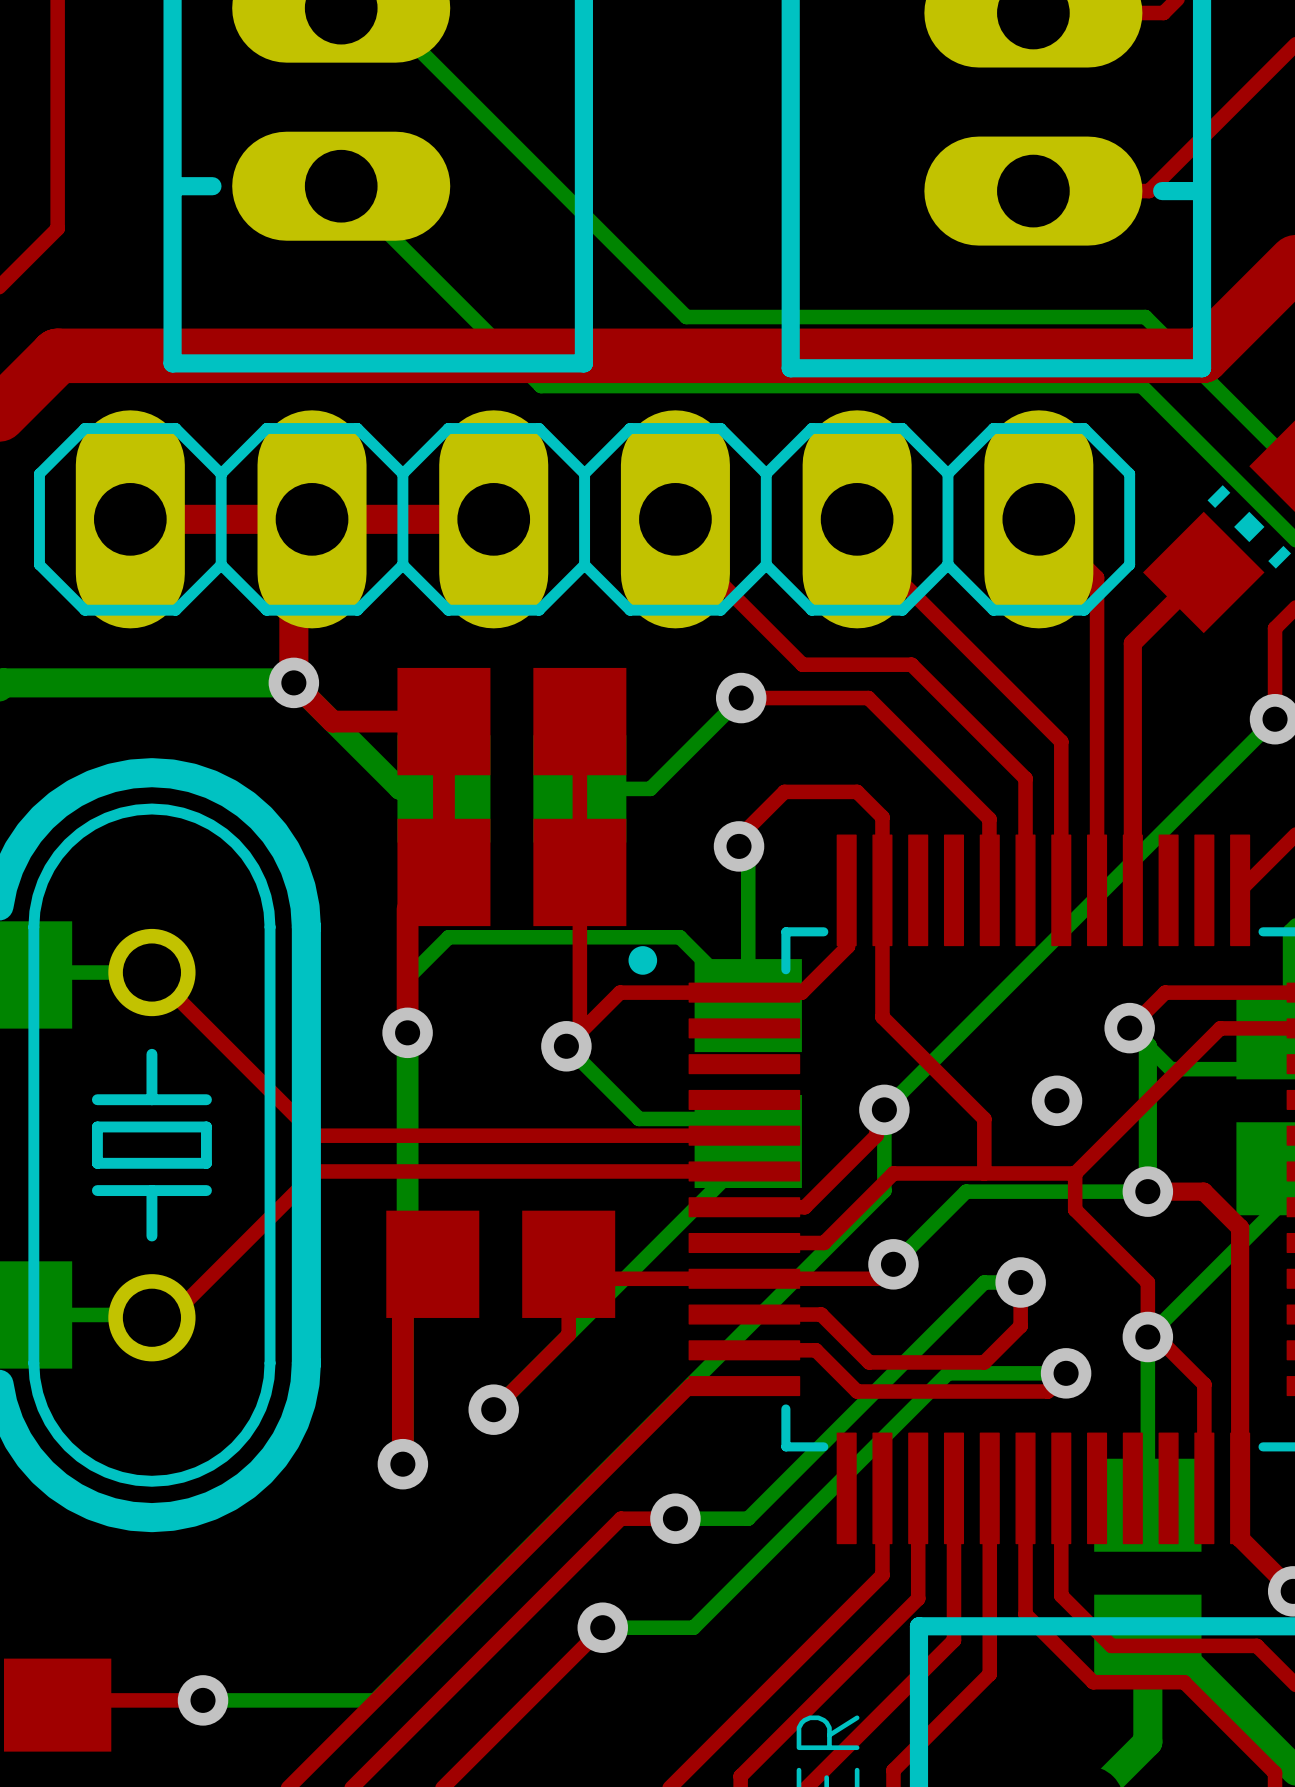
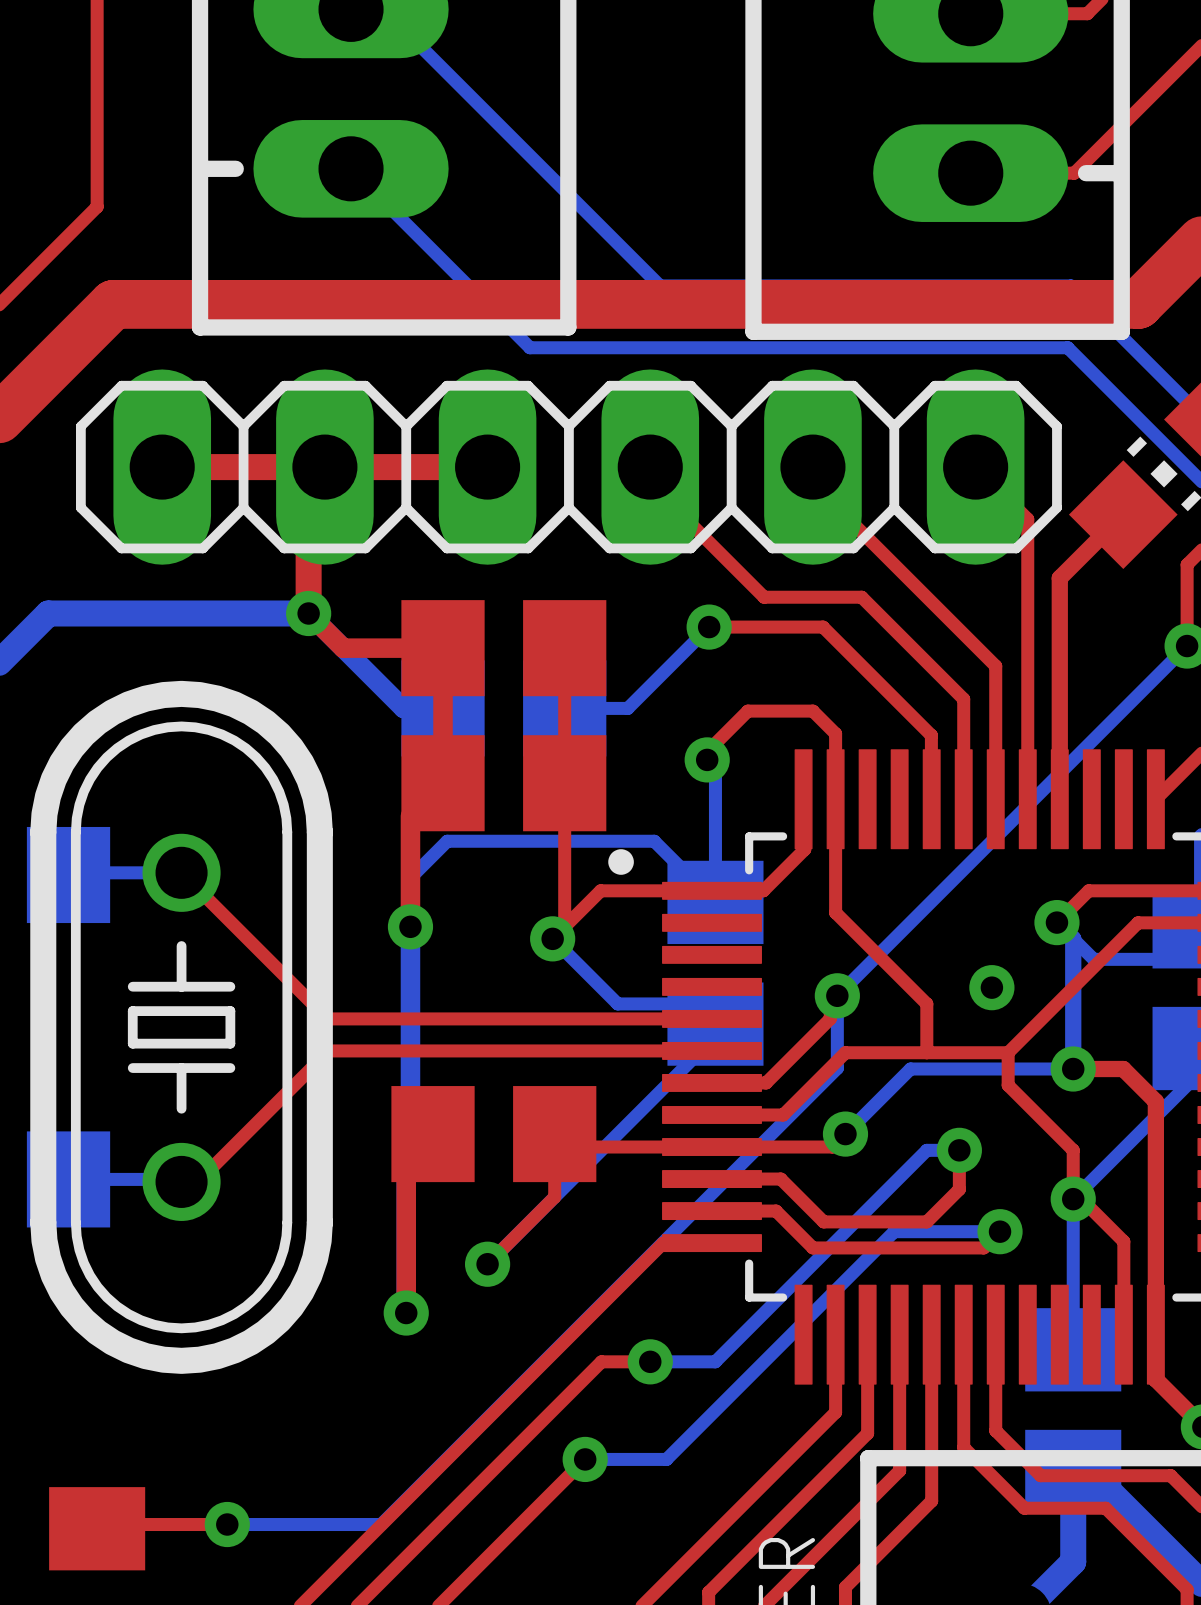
top track: (1220, 337) (1202, 355) (57, 355) -> (1138, 304) (113, 304) (97, 320)

